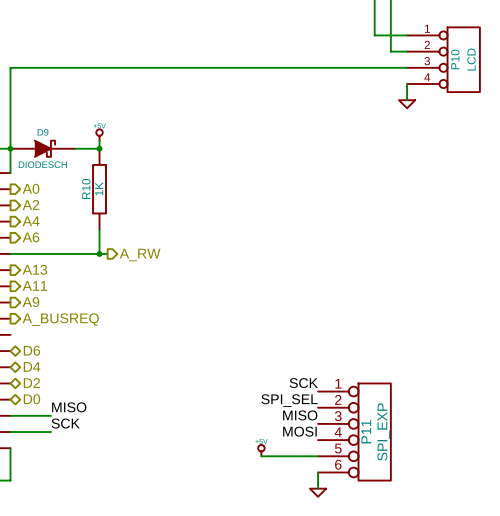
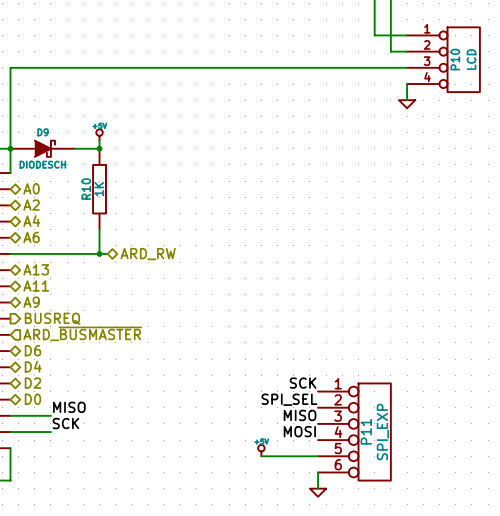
hierarchical label shape: output (31, 188) -> bidirectional (31, 188)
hierarchical label shape: output (30, 204) -> bidirectional (31, 205)
hierarchical label shape: output (31, 221) -> bidirectional (31, 220)
hierarchical label shape: output (30, 237) -> bidirectional (31, 237)
hierarchical label shape: output (140, 255) -> bidirectional (148, 254)
hierarchical label: A_RW (140, 255) -> ARD_RW (148, 254)
hierarchical label shape: output (34, 269) -> bidirectional (36, 269)
hierarchical label shape: output (34, 285) -> bidirectional (36, 285)
hierarchical label shape: output (30, 302) -> bidirectional (31, 302)
hierarchical label: A_BUSREQ (60, 319) -> BUSREQ (52, 318)
hierarchical label: none -> ARD_~{BUSMASTER} (82, 333)

